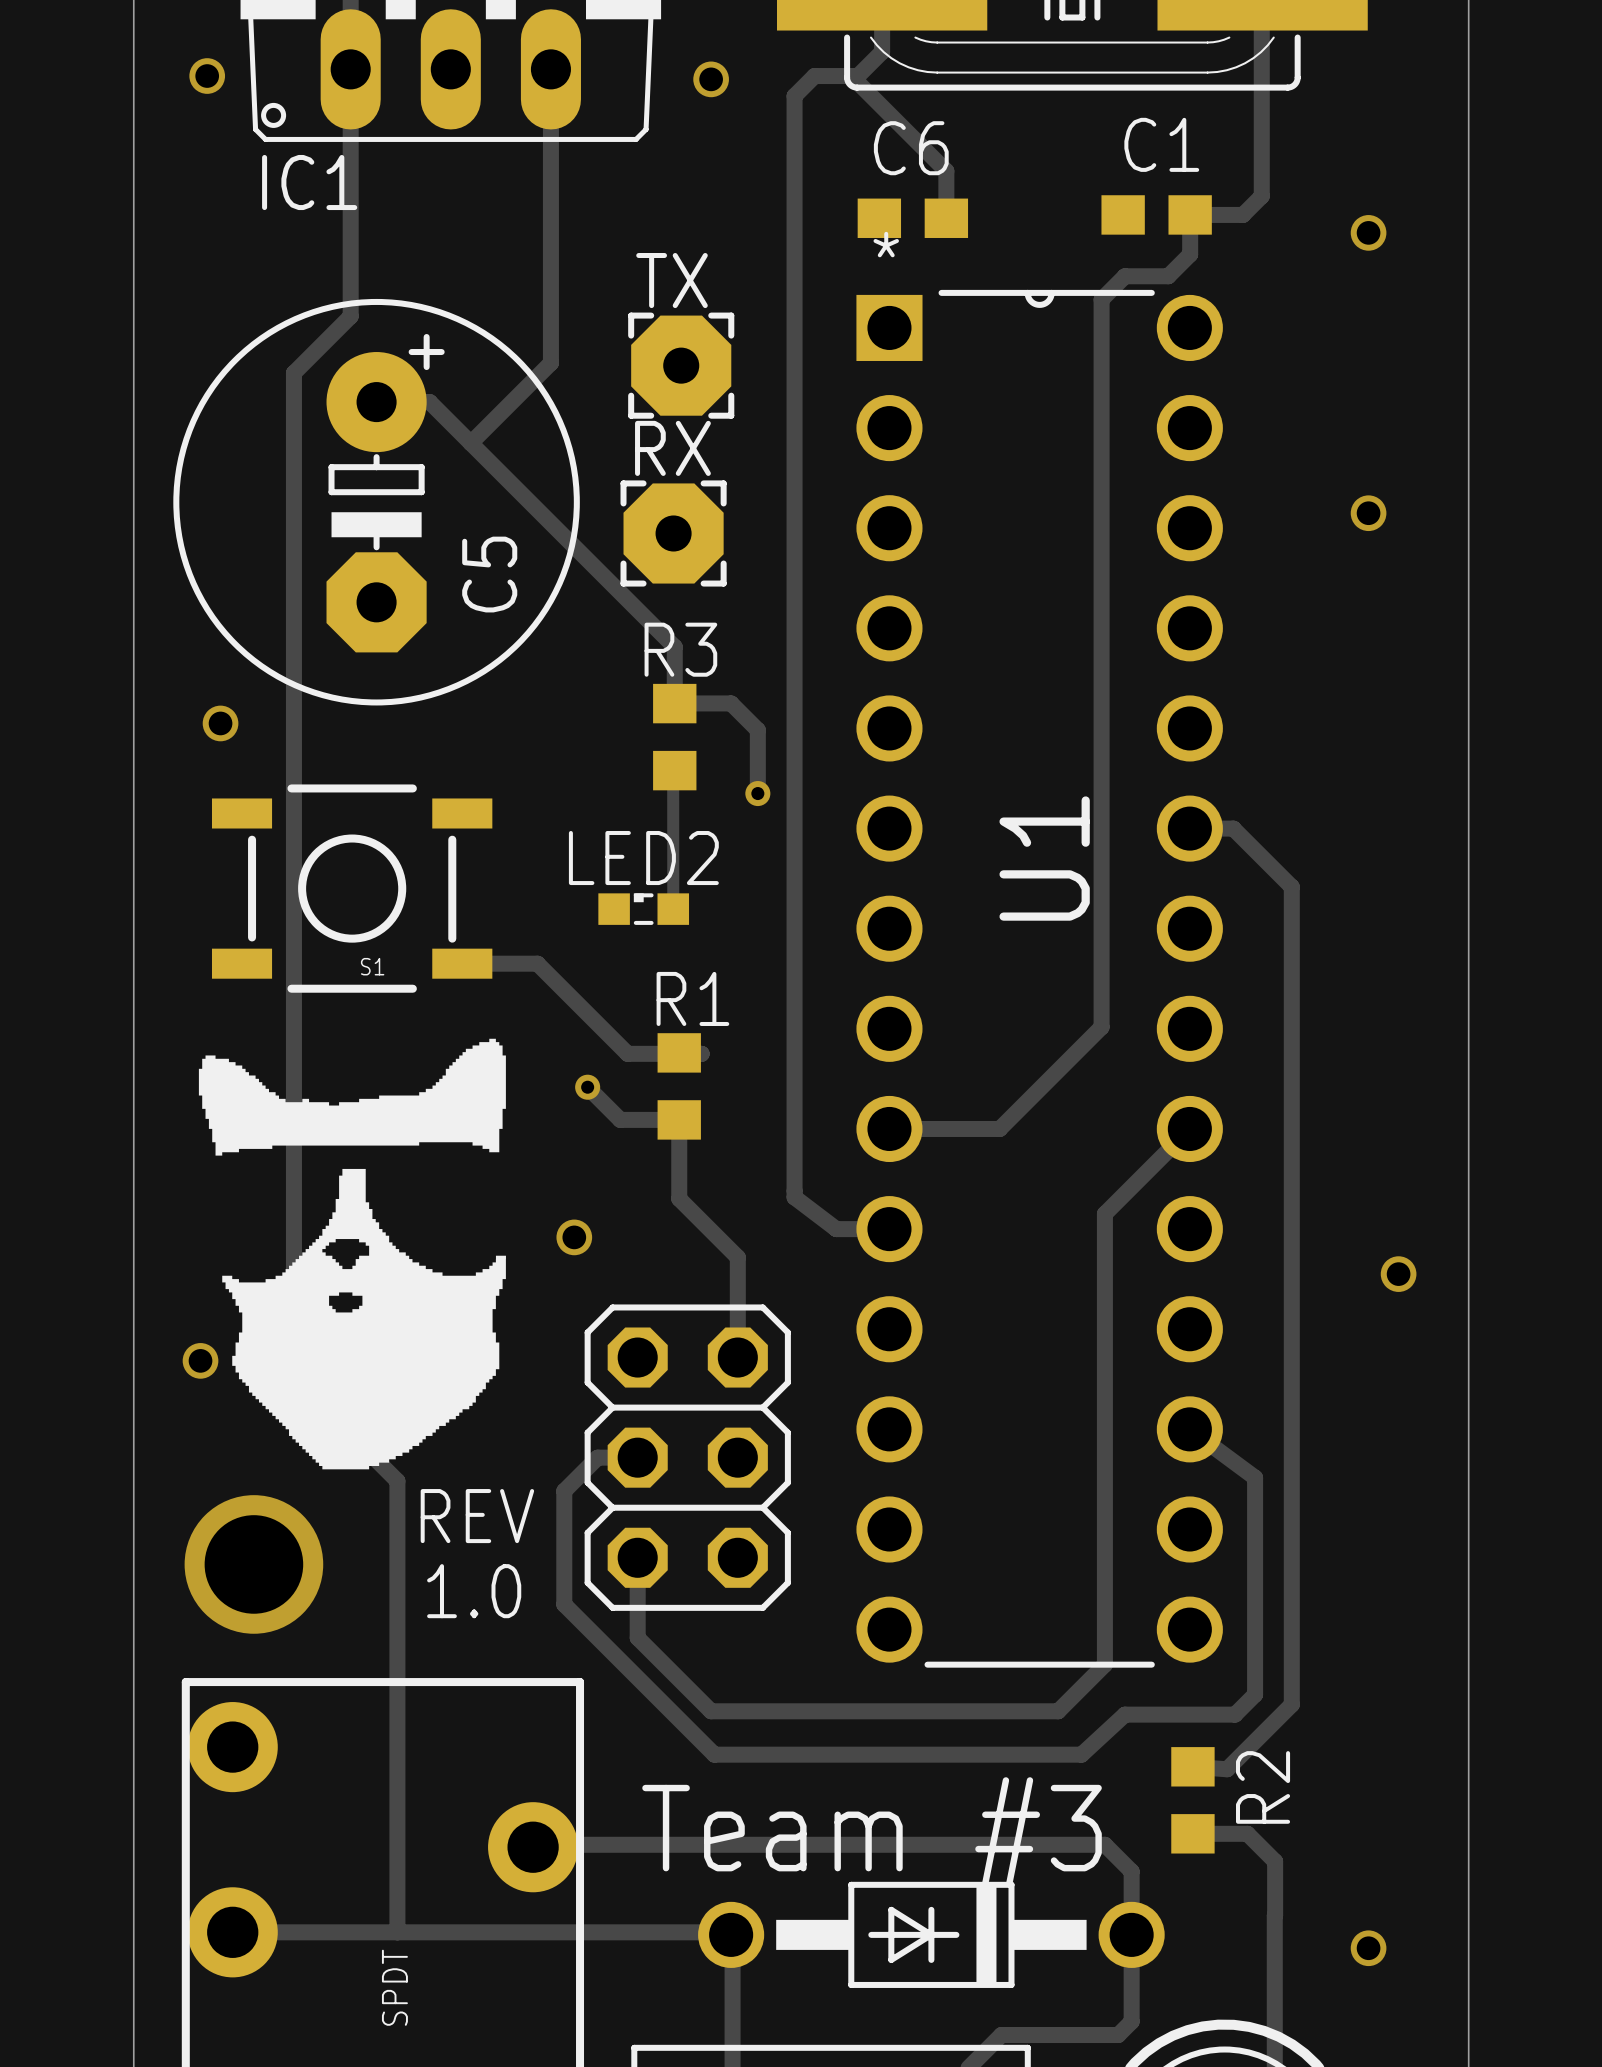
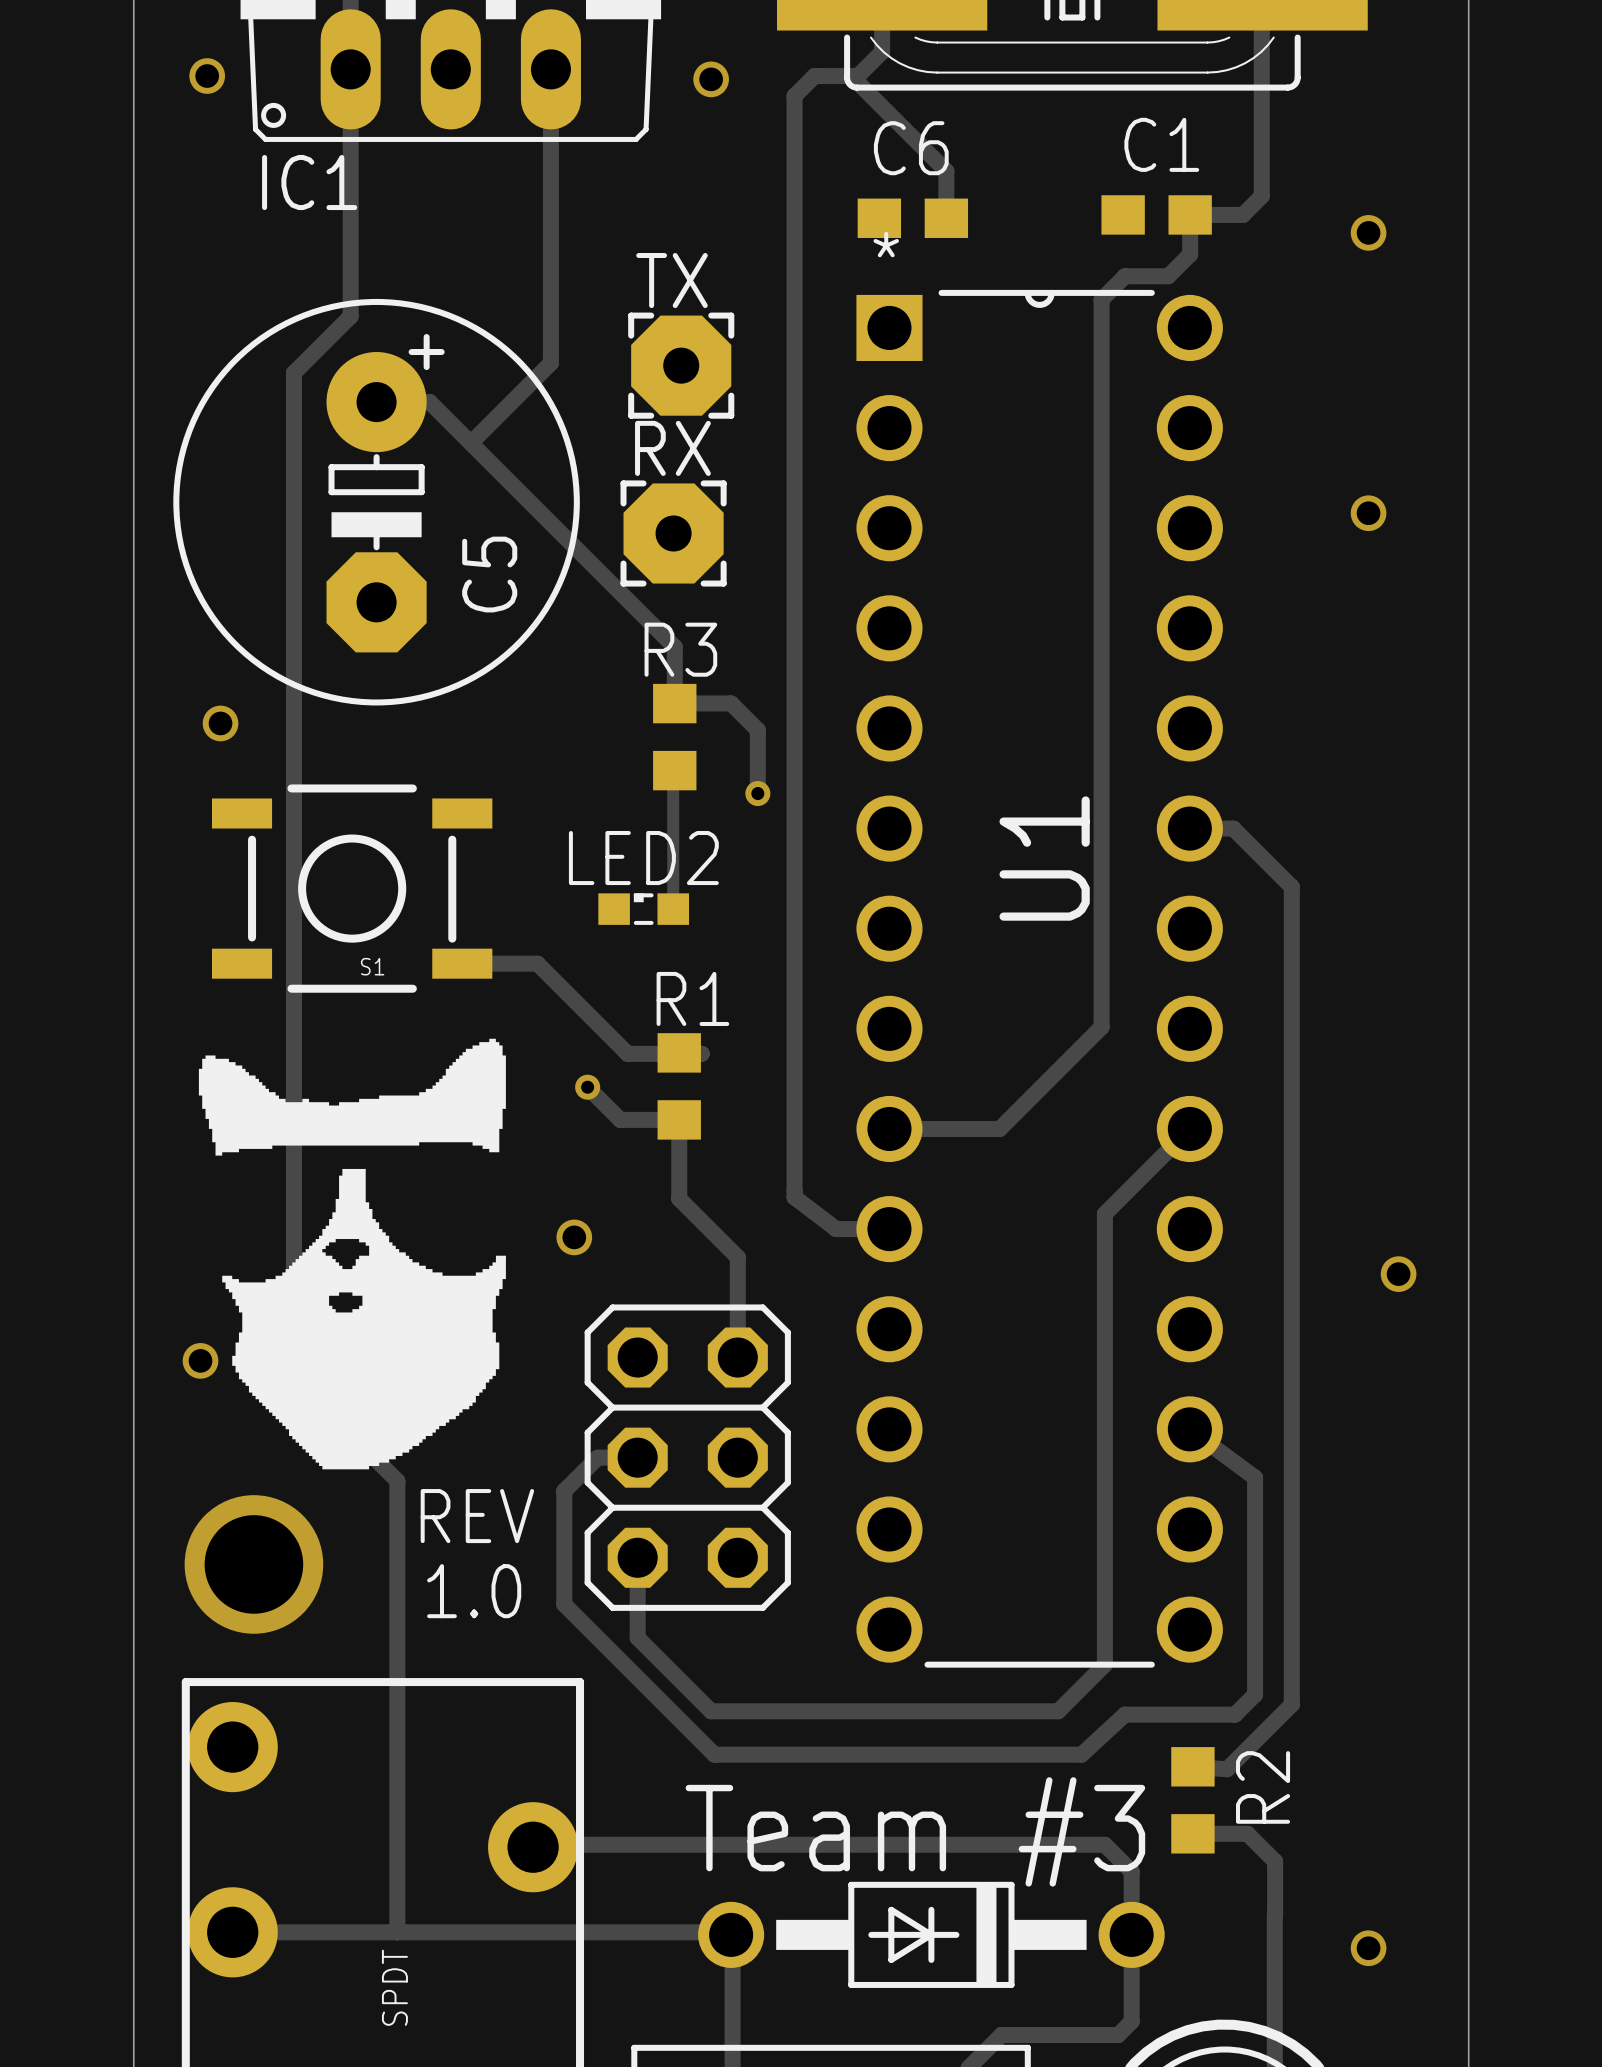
text position: Team #3 (872, 1831) -> Team #3 (915, 1831)

